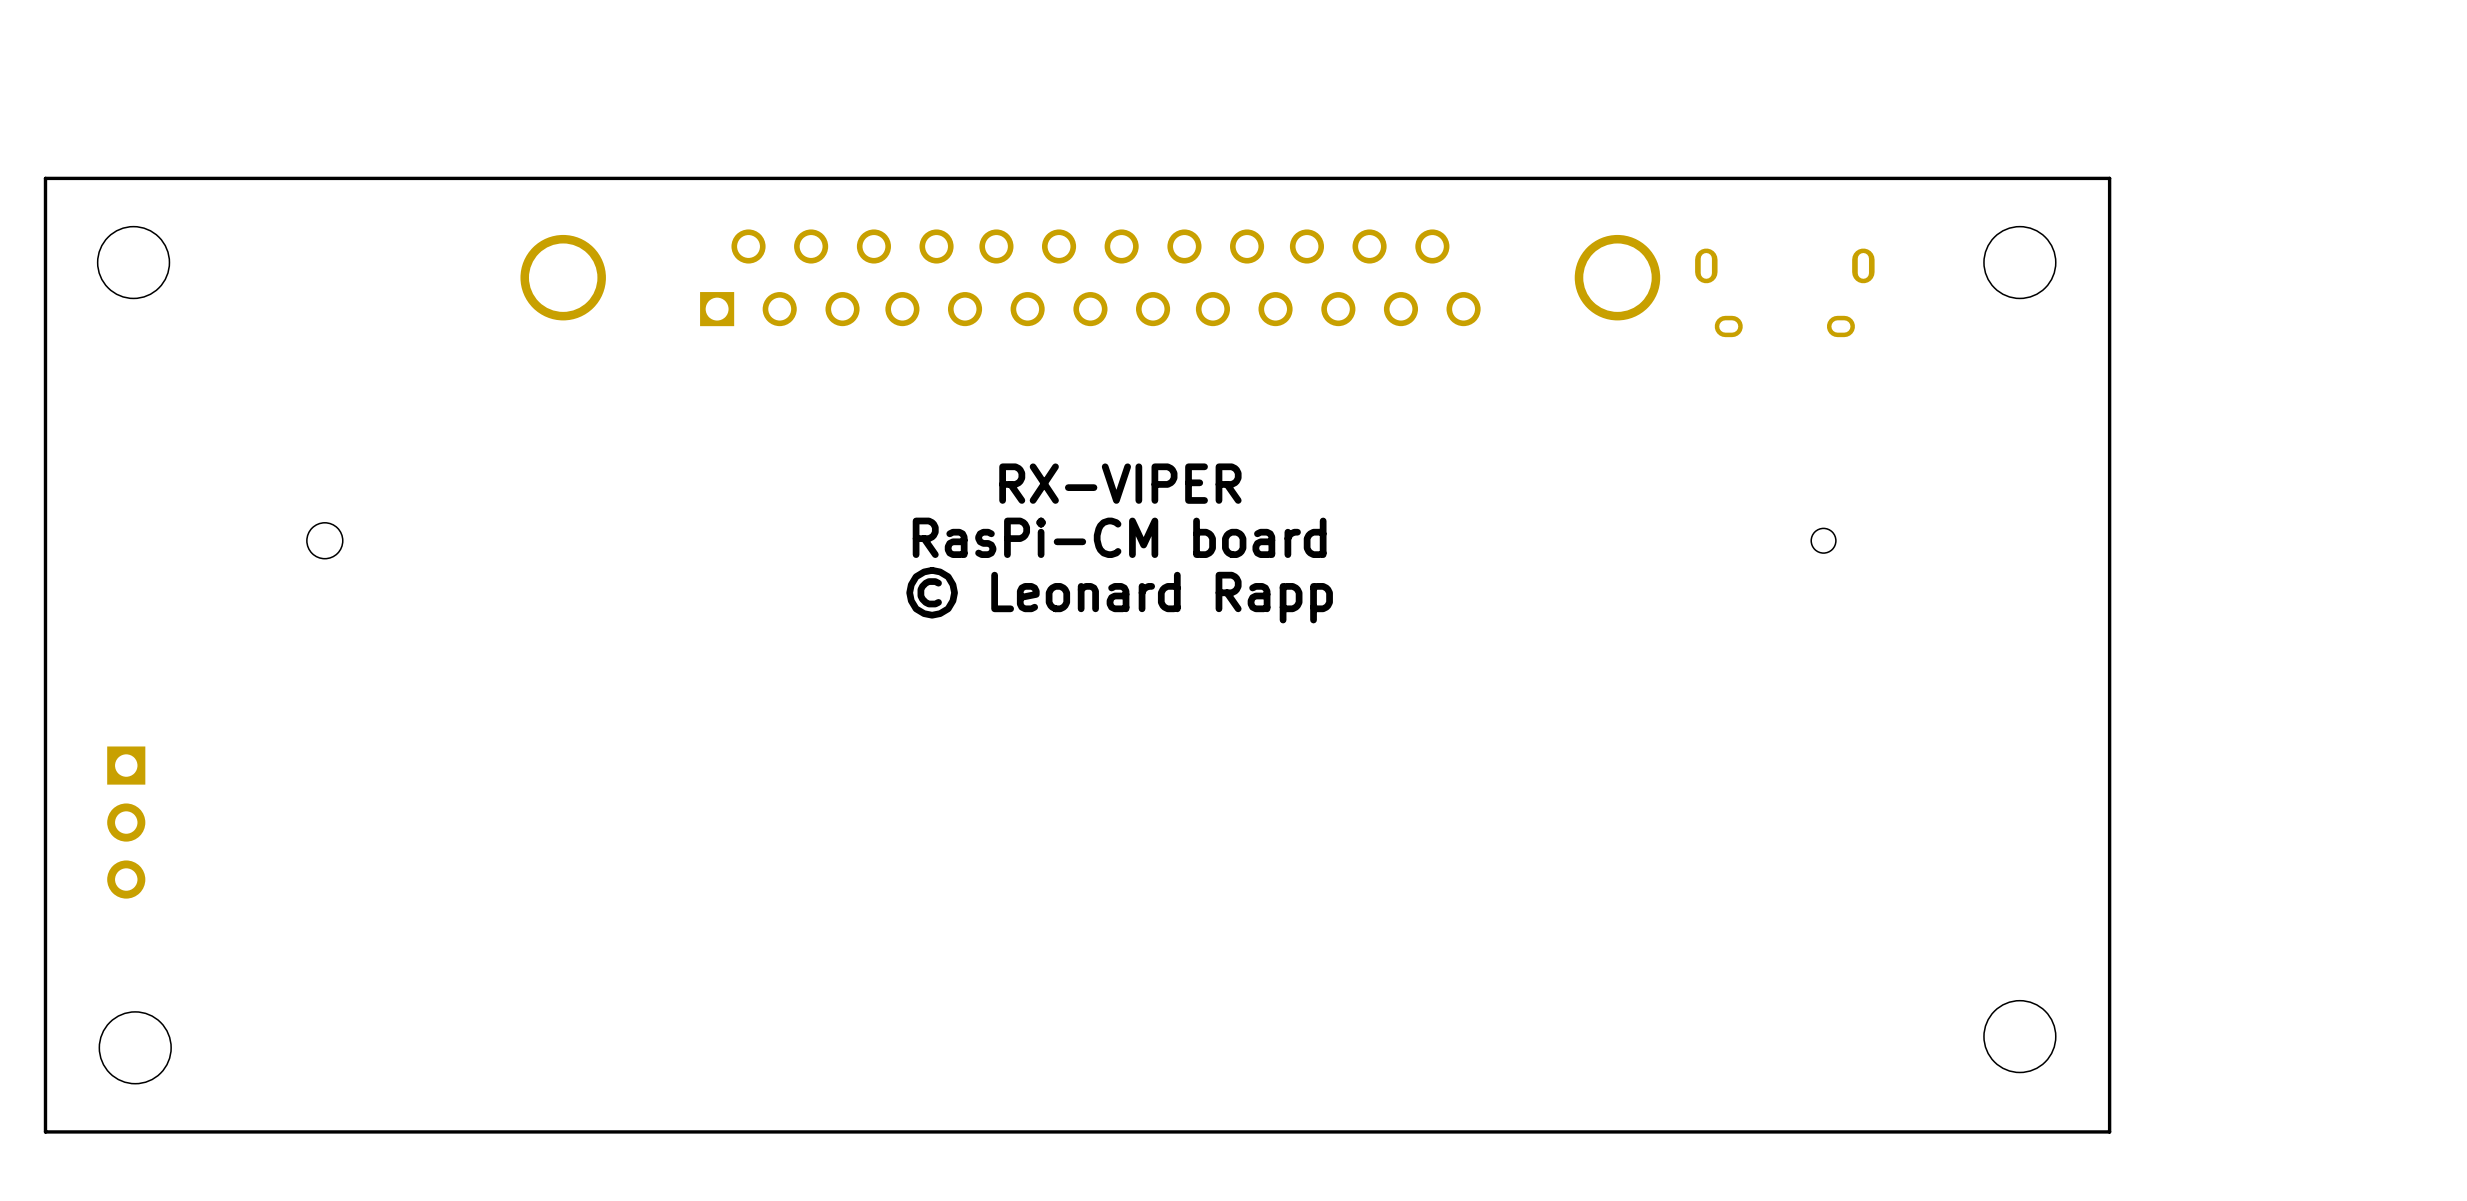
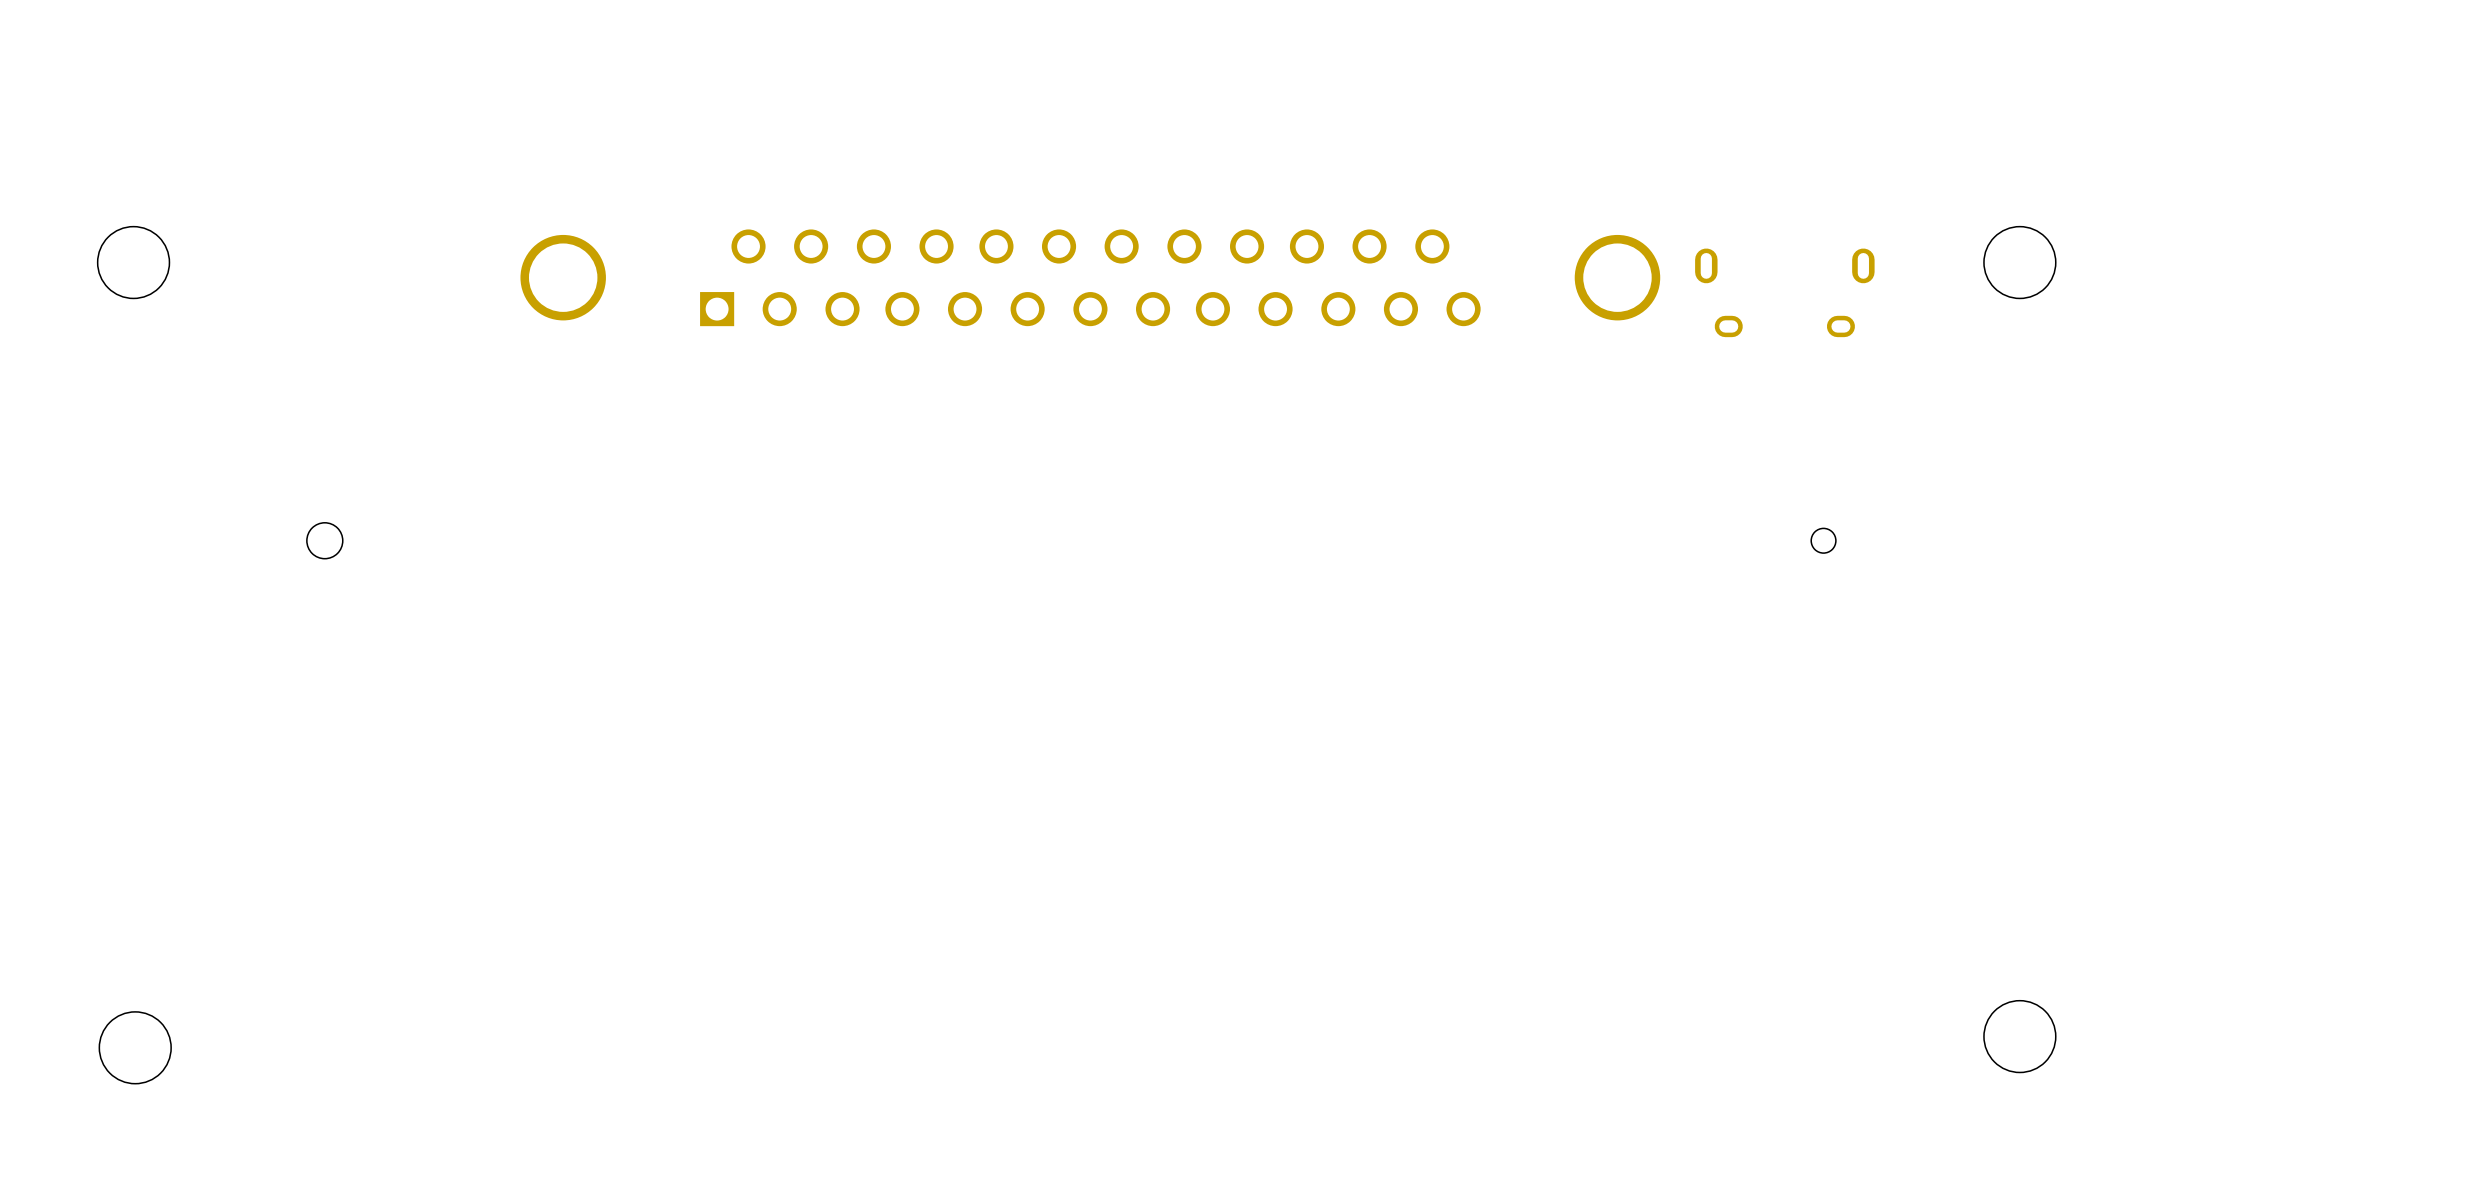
board edge: (2109, 178) (2109, 1131) (45, 1131) (45, 178) (2109, 178) -> none
text: RX-VIPER (1120, 483) -> none
text: RasPi-CM board (1119, 537) -> none
text: © Leonard Rapp (1119, 595) -> none
part: (126, 822) -> none

